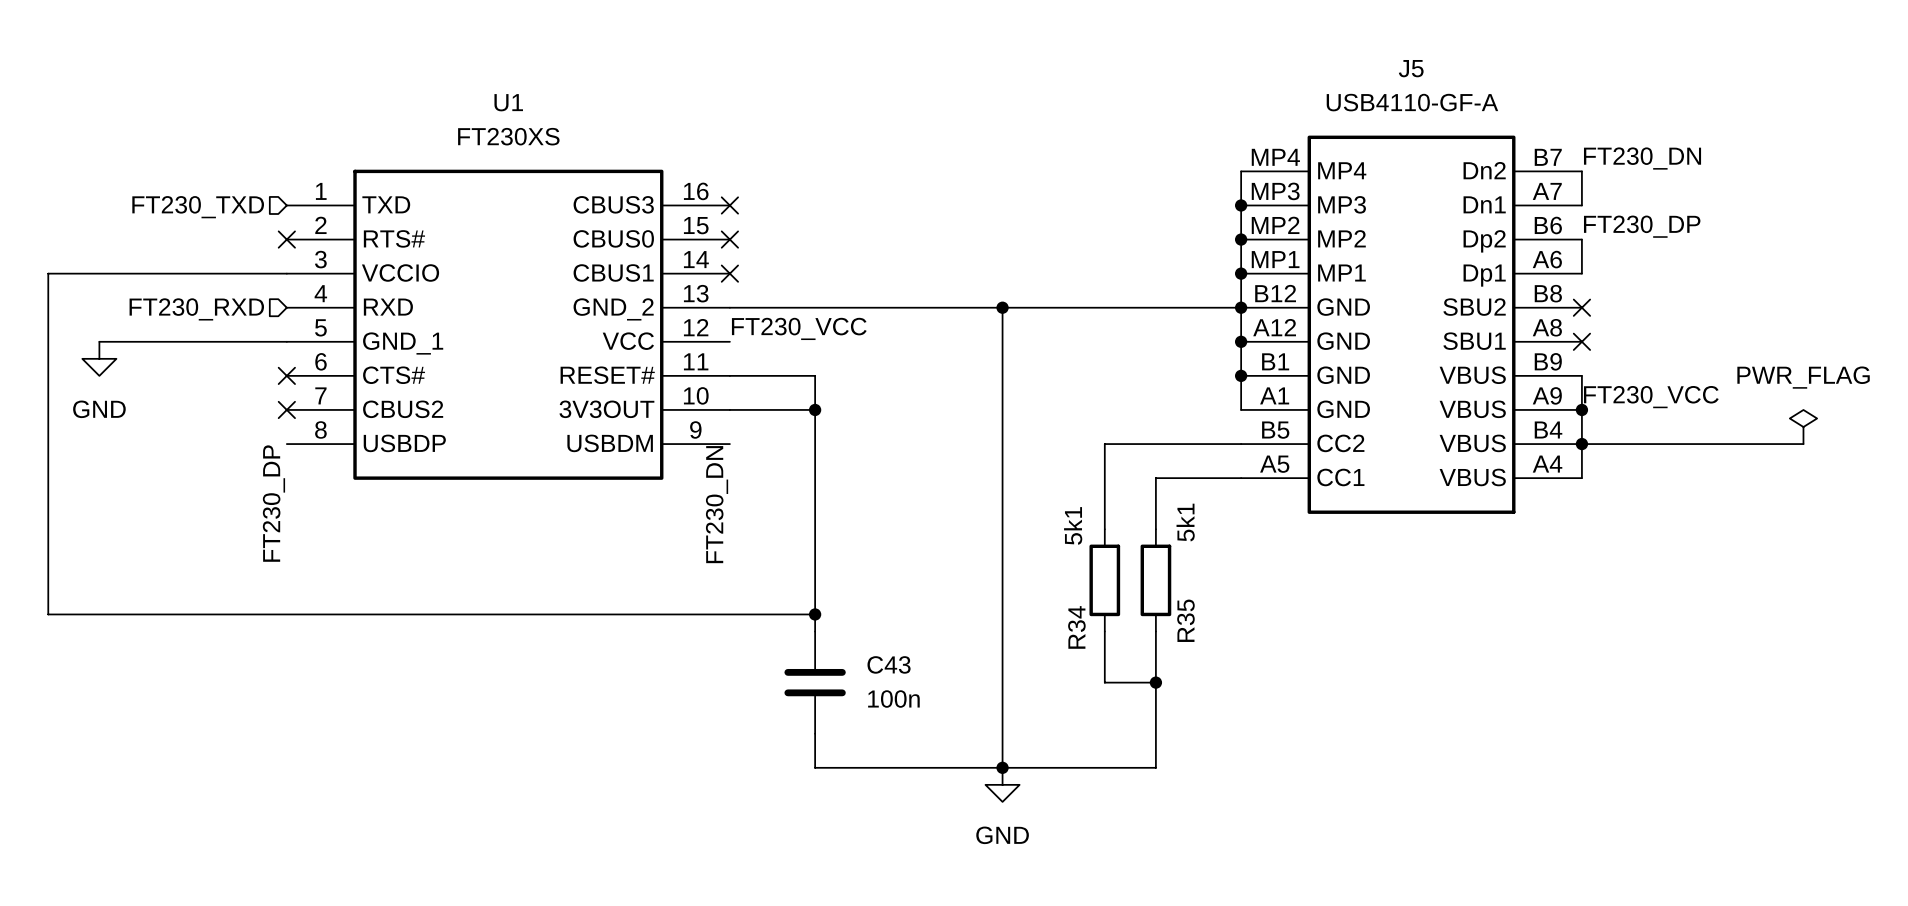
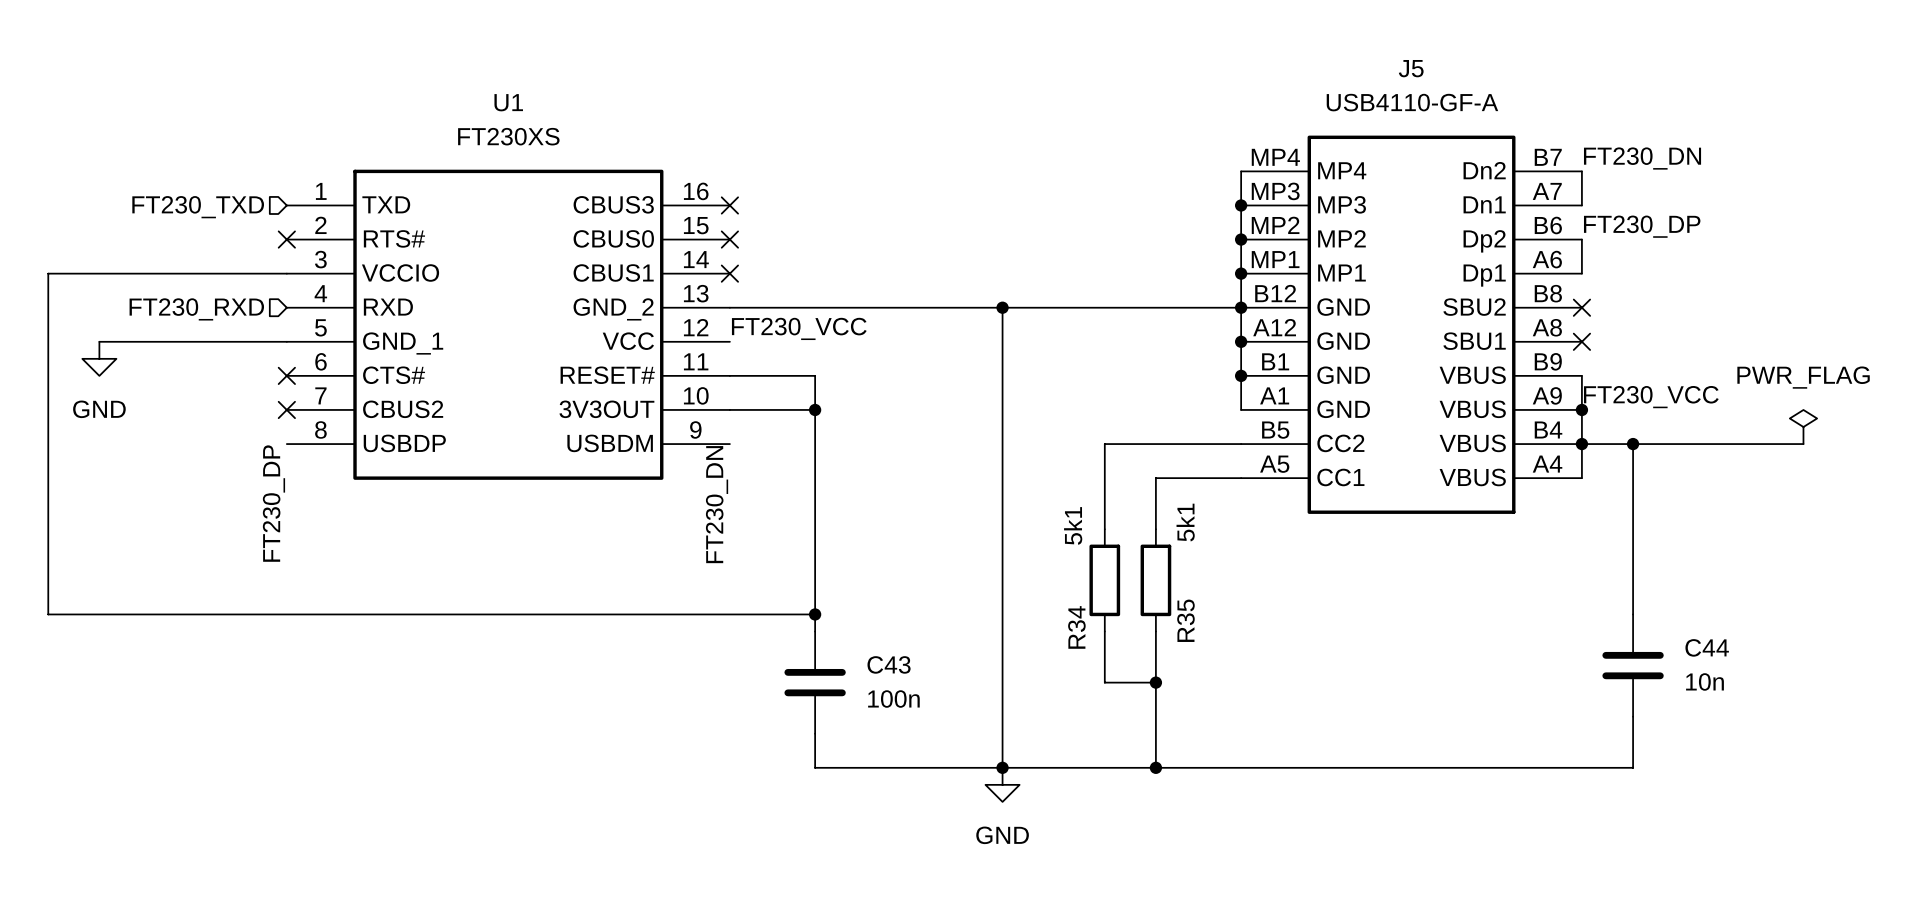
wire: none -> (1633, 444) (1633, 614)
junction: none -> (1633, 444)
C44: none -> 10n (1633, 665)
wire: none -> (1633, 716) (1633, 767) (1155, 767)
junction: none -> (1155, 767)

